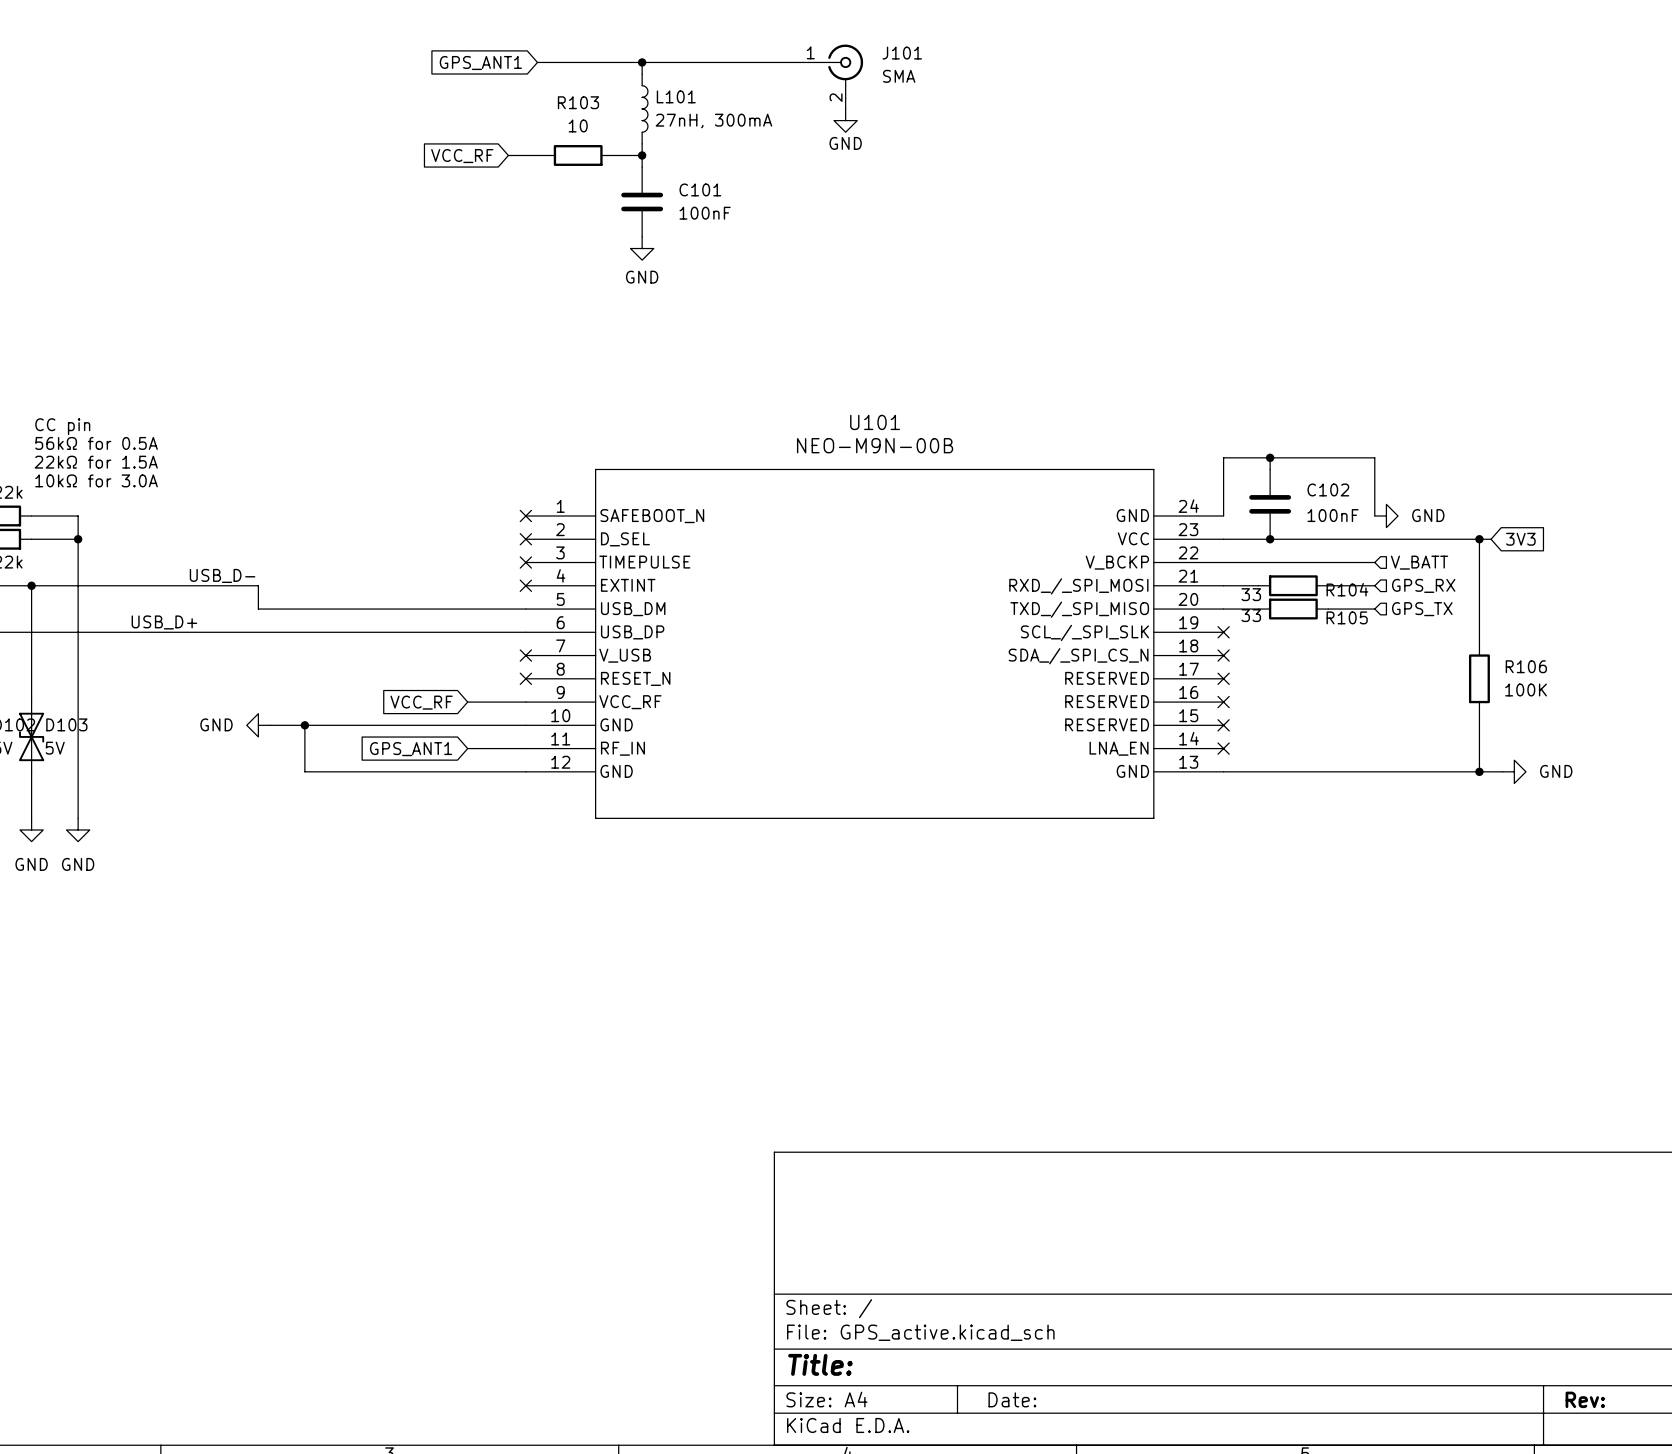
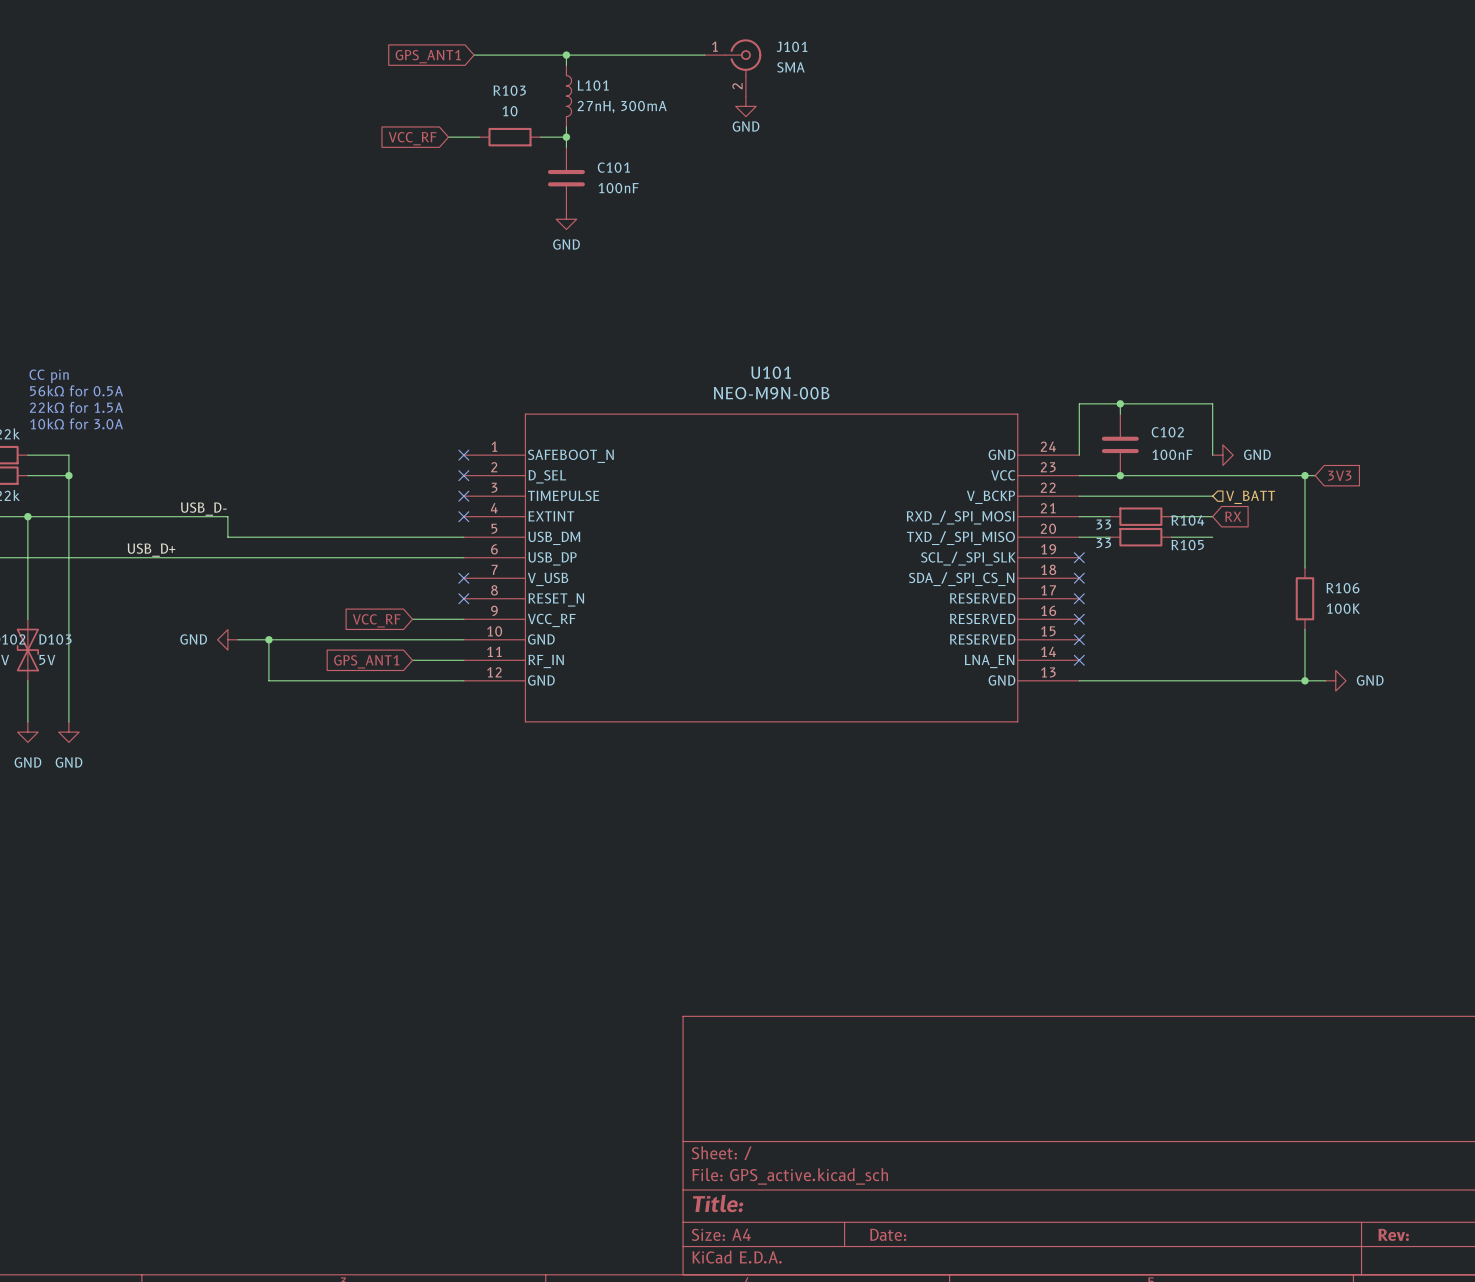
global label: none -> RX (1233, 516)
hierarchical label: GPS_RX (1423, 585) -> none
hierarchical label: GPS_TX (1422, 609) -> none

